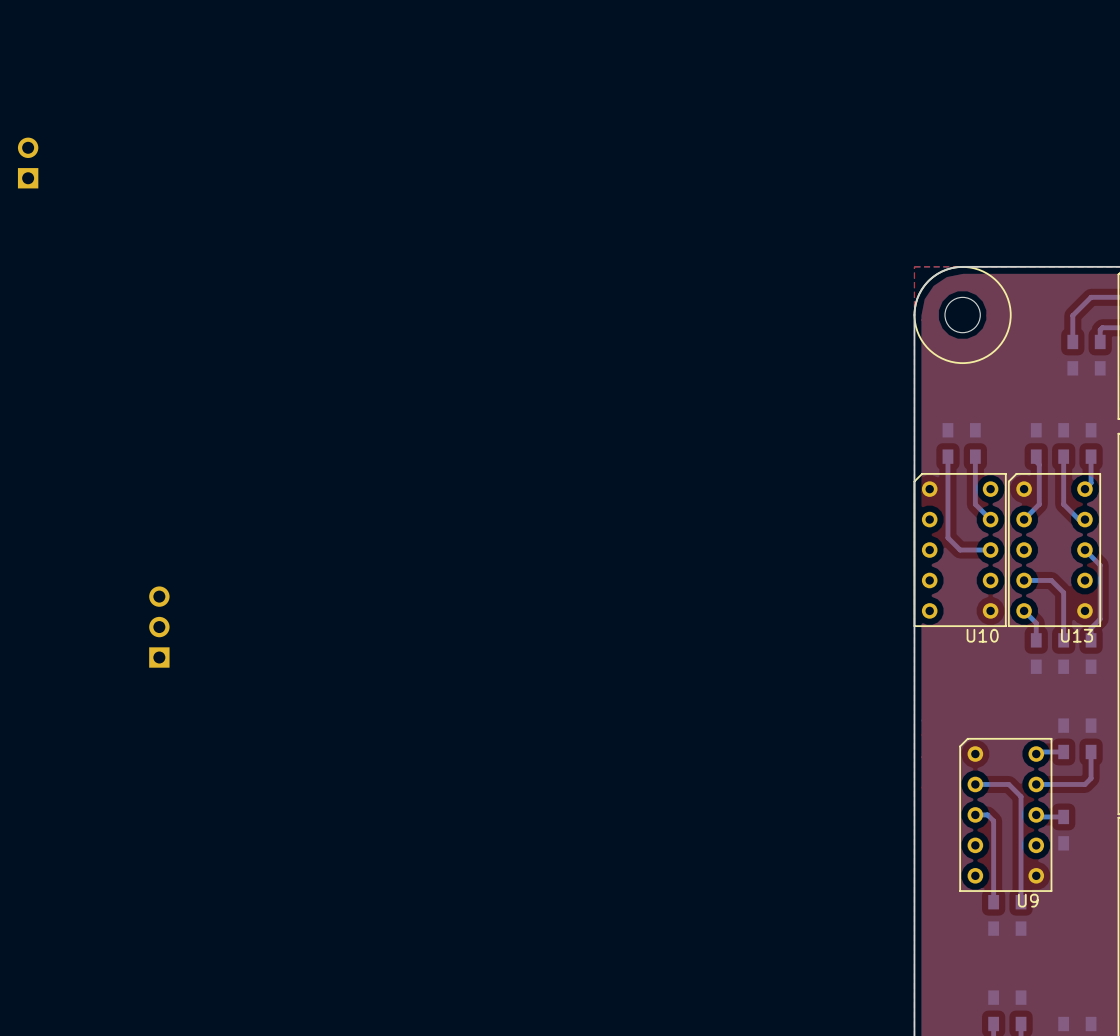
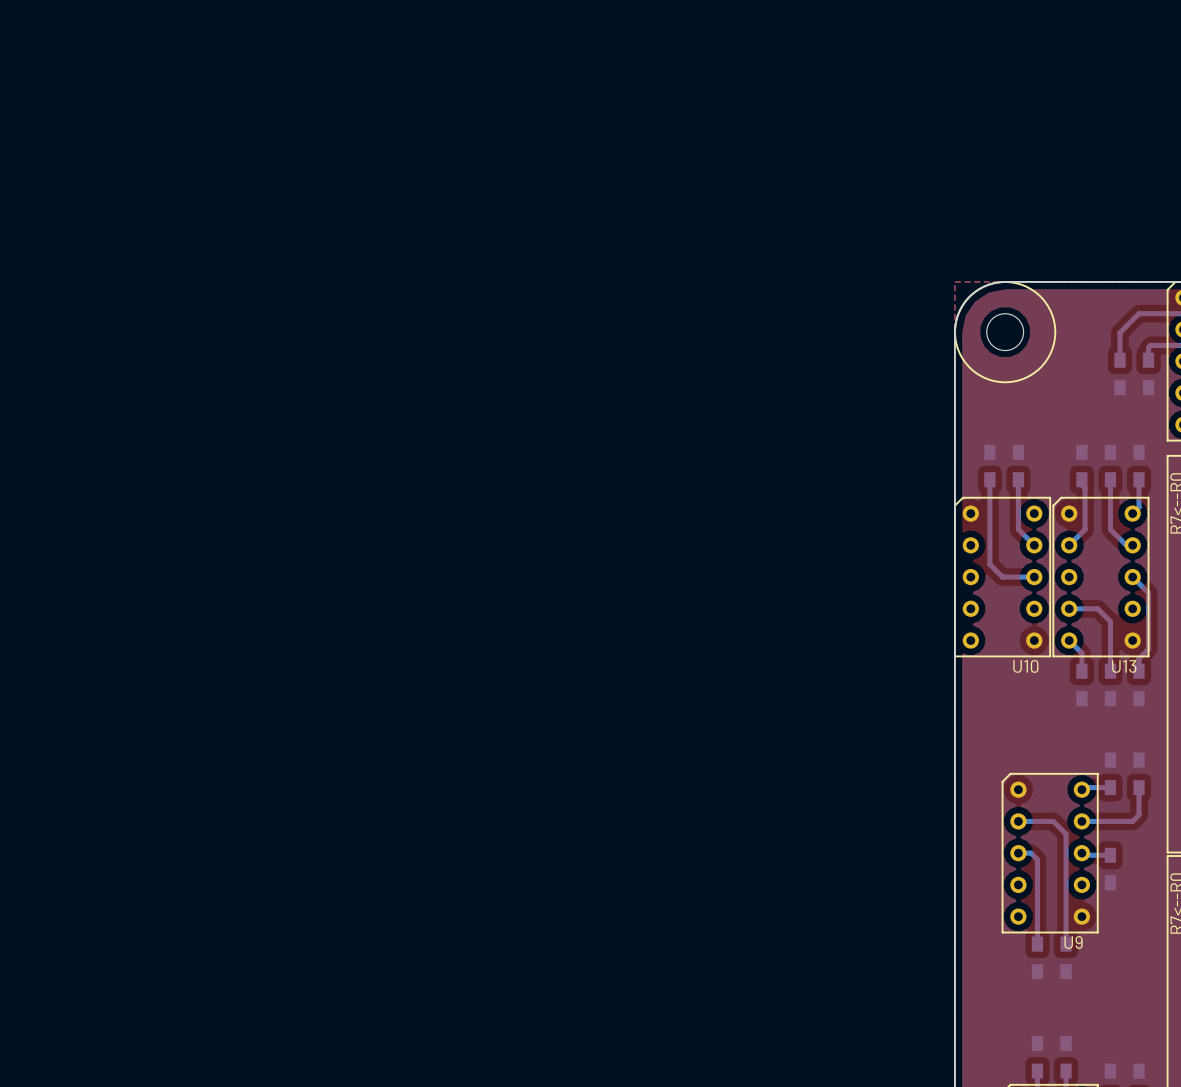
part: (28, 163) -> none
part: (159, 627) -> none

